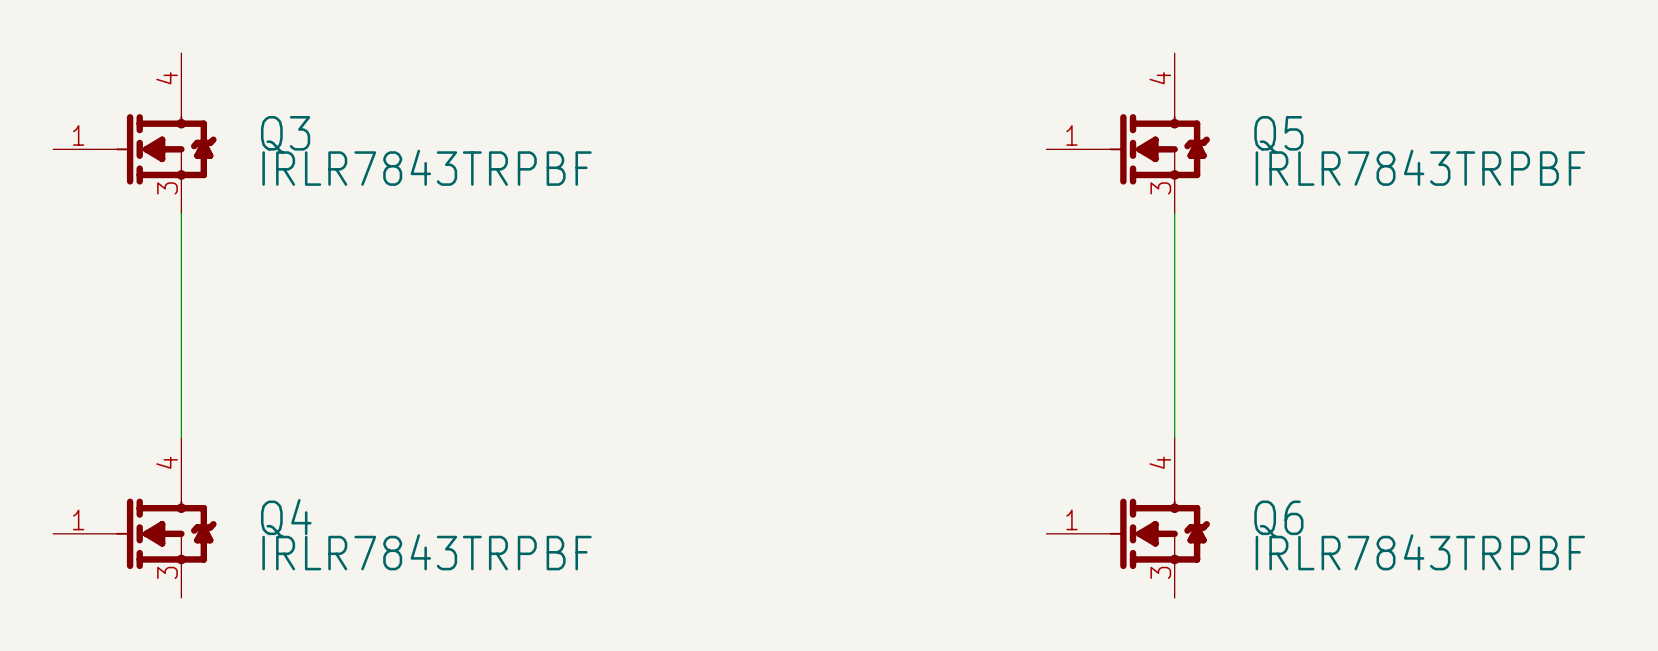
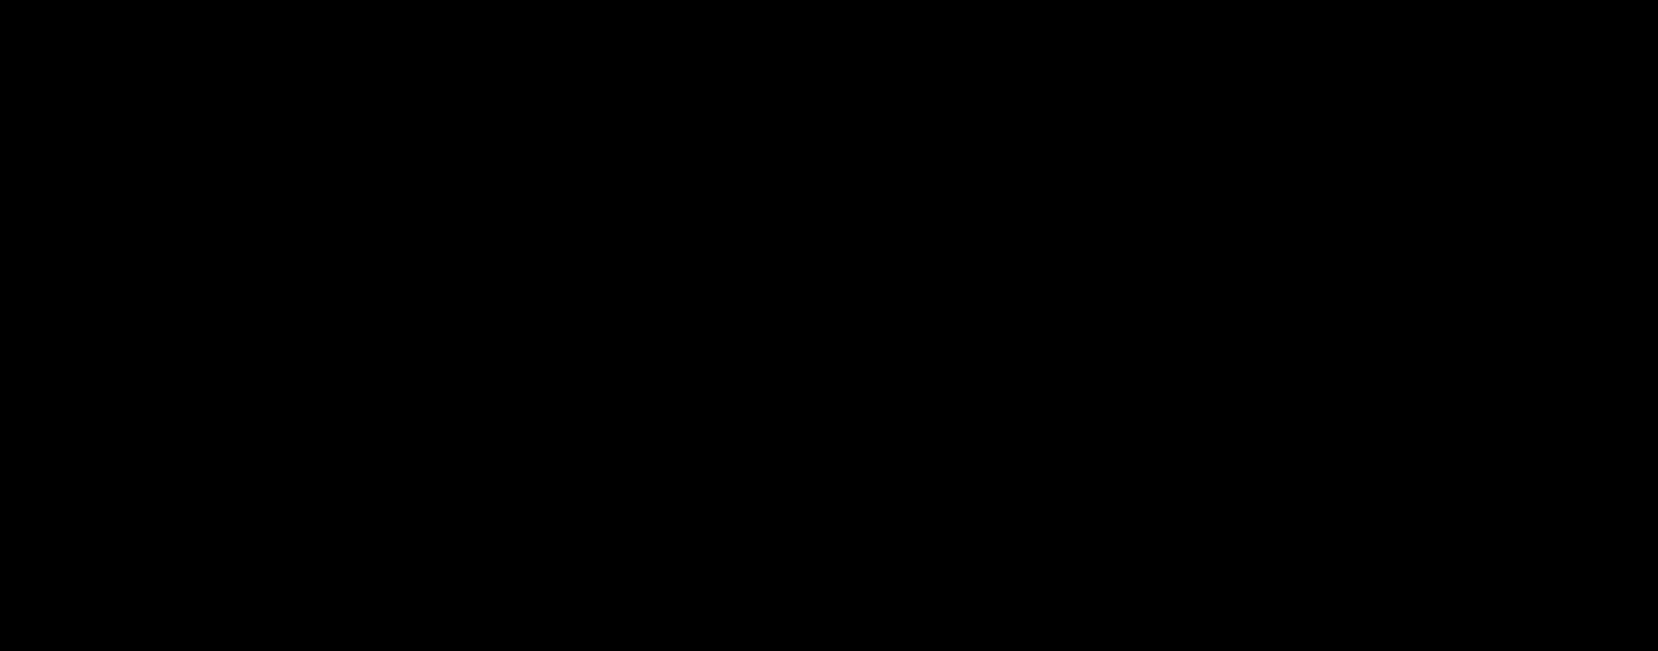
Q3: (134, 133) -> none
Q5: (1128, 133) -> none
wire: (181, 213) (181, 437) -> none
wire: (1174, 213) (1174, 437) -> none
Q4: (134, 517) -> none
Q6: (1128, 517) -> none

